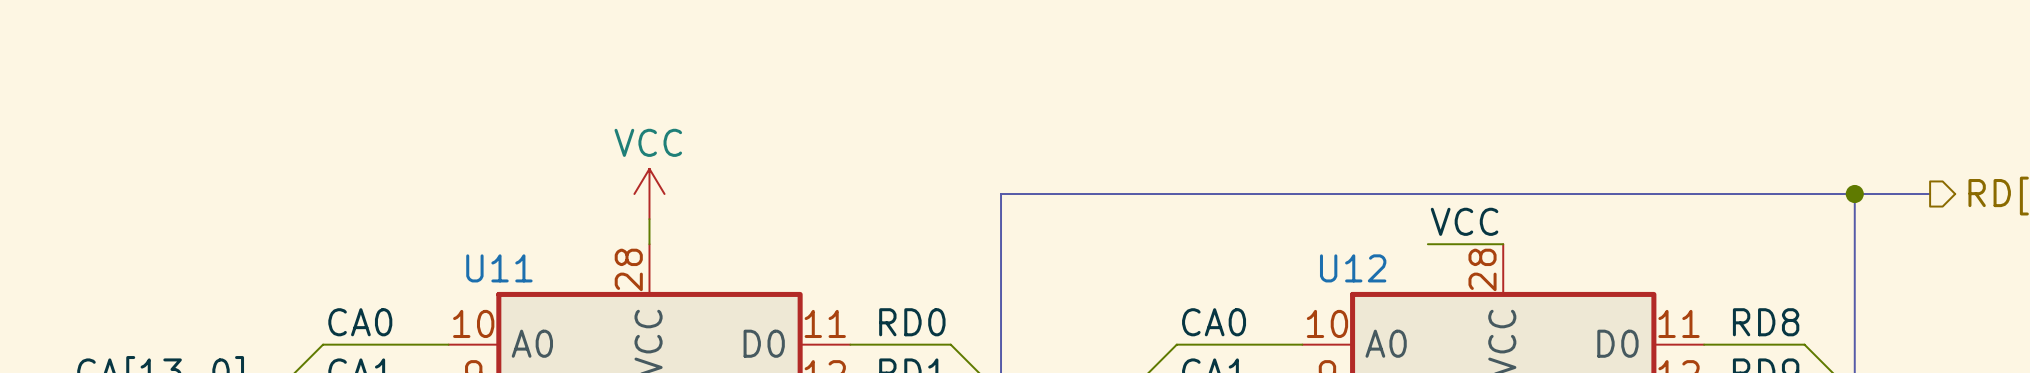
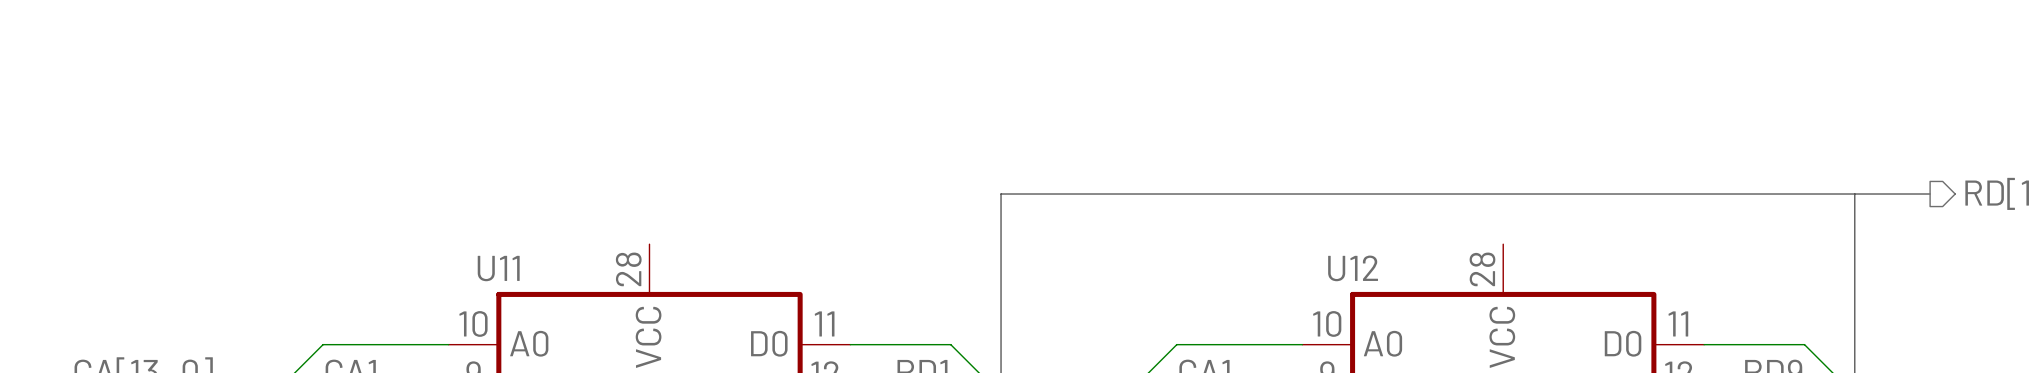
power symbol: VCC (649, 194) -> none
junction: (1854, 194) -> none
wire: (649, 219) (649, 244) -> none
label: VCC (1464, 221) -> none
wire: (1427, 244) (1503, 244) -> none
label: CA0 (360, 322) -> none
label: RD0 (912, 322) -> none
label: CA0 (1214, 322) -> none
label: RD8 (1766, 322) -> none

